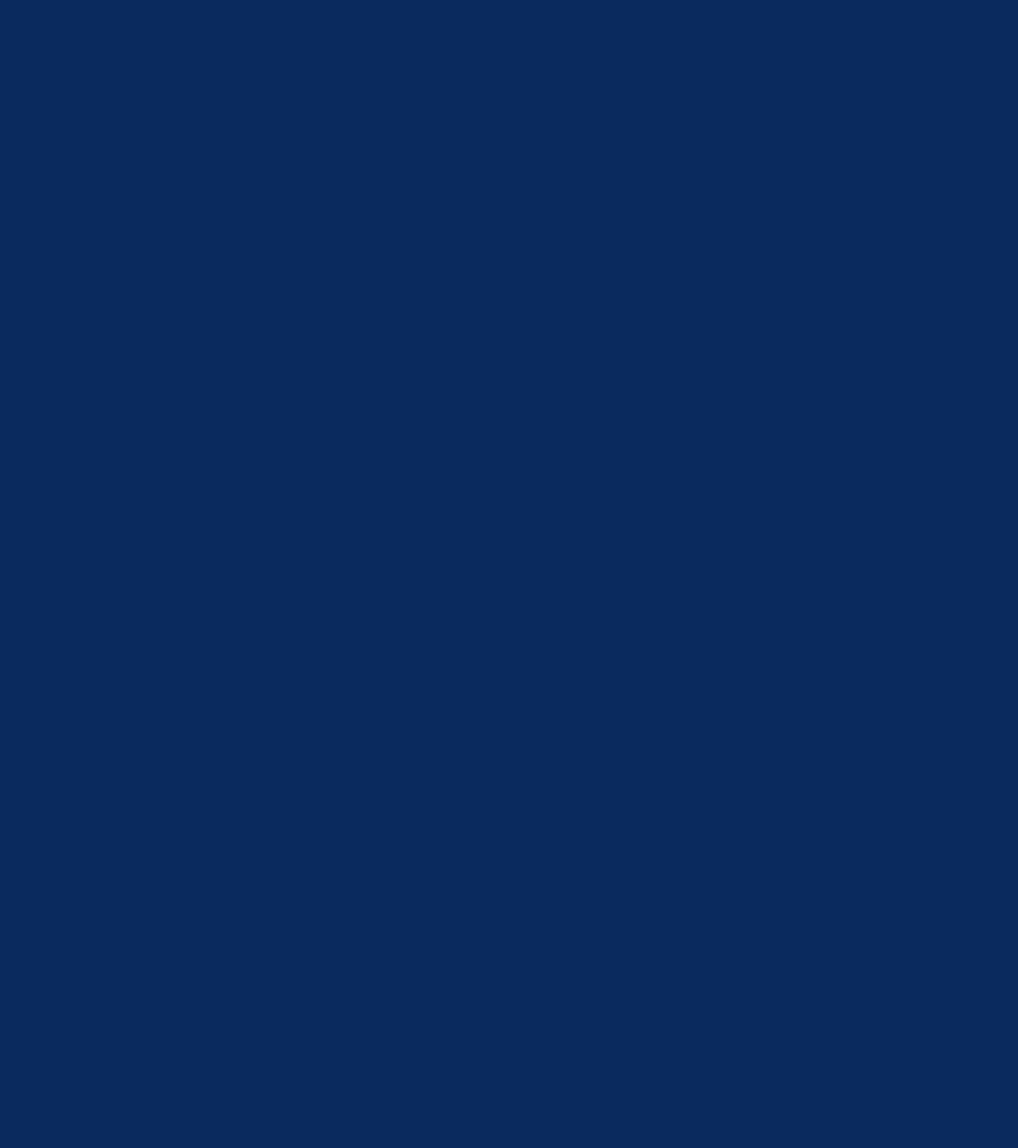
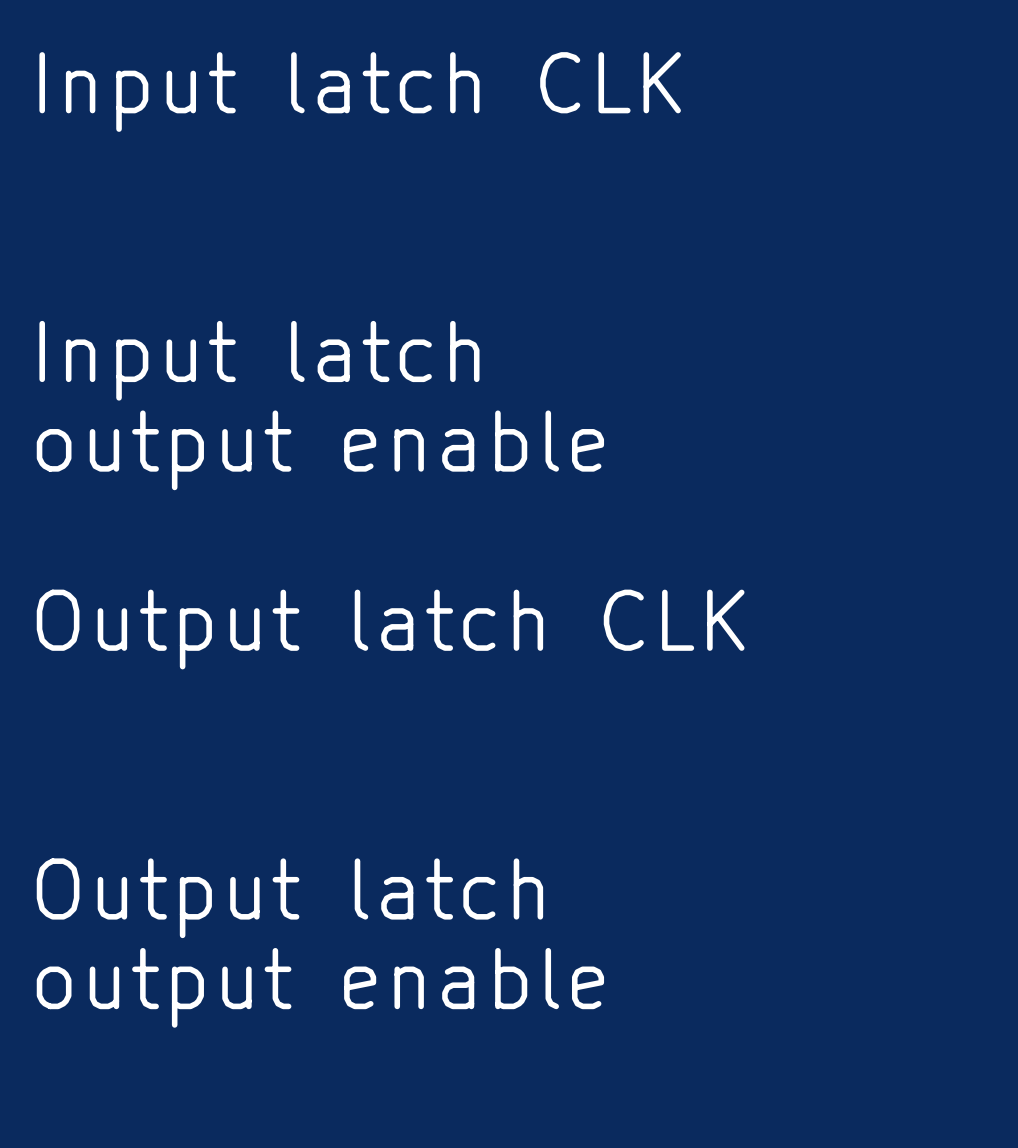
text: none -> Input latch CLK (360, 92)
text: none -> Input latch (259, 360)
text: none -> output enable (320, 450)
text: none -> Output latch CLK (390, 629)
text: none -> Output latch (289, 898)
text: none -> output enable (320, 987)

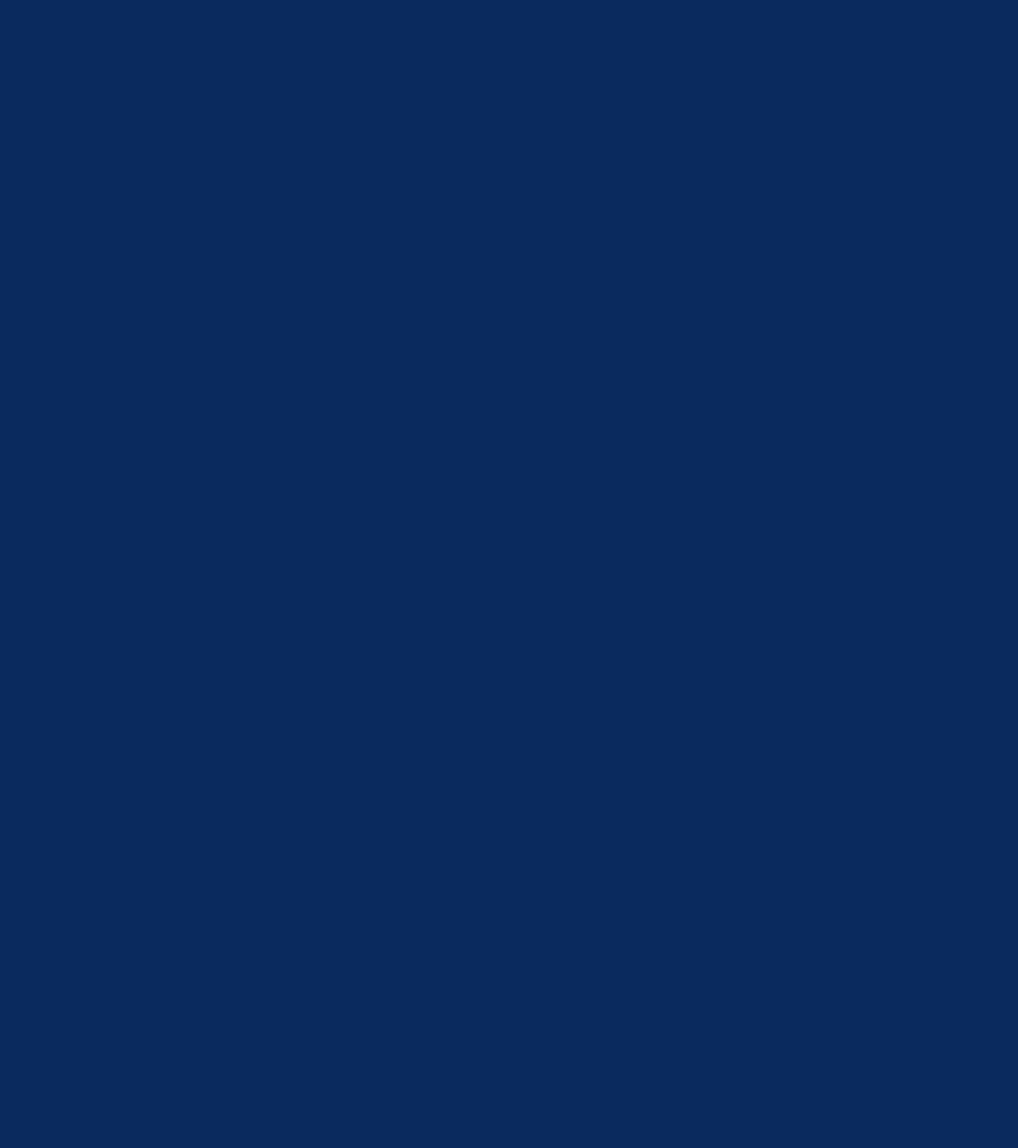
text: Input latch CLK (360, 92) -> none
text: Input latch (259, 360) -> none
text: output enable (320, 450) -> none
text: Output latch CLK (390, 629) -> none
text: Output latch (289, 898) -> none
text: output enable (320, 987) -> none

